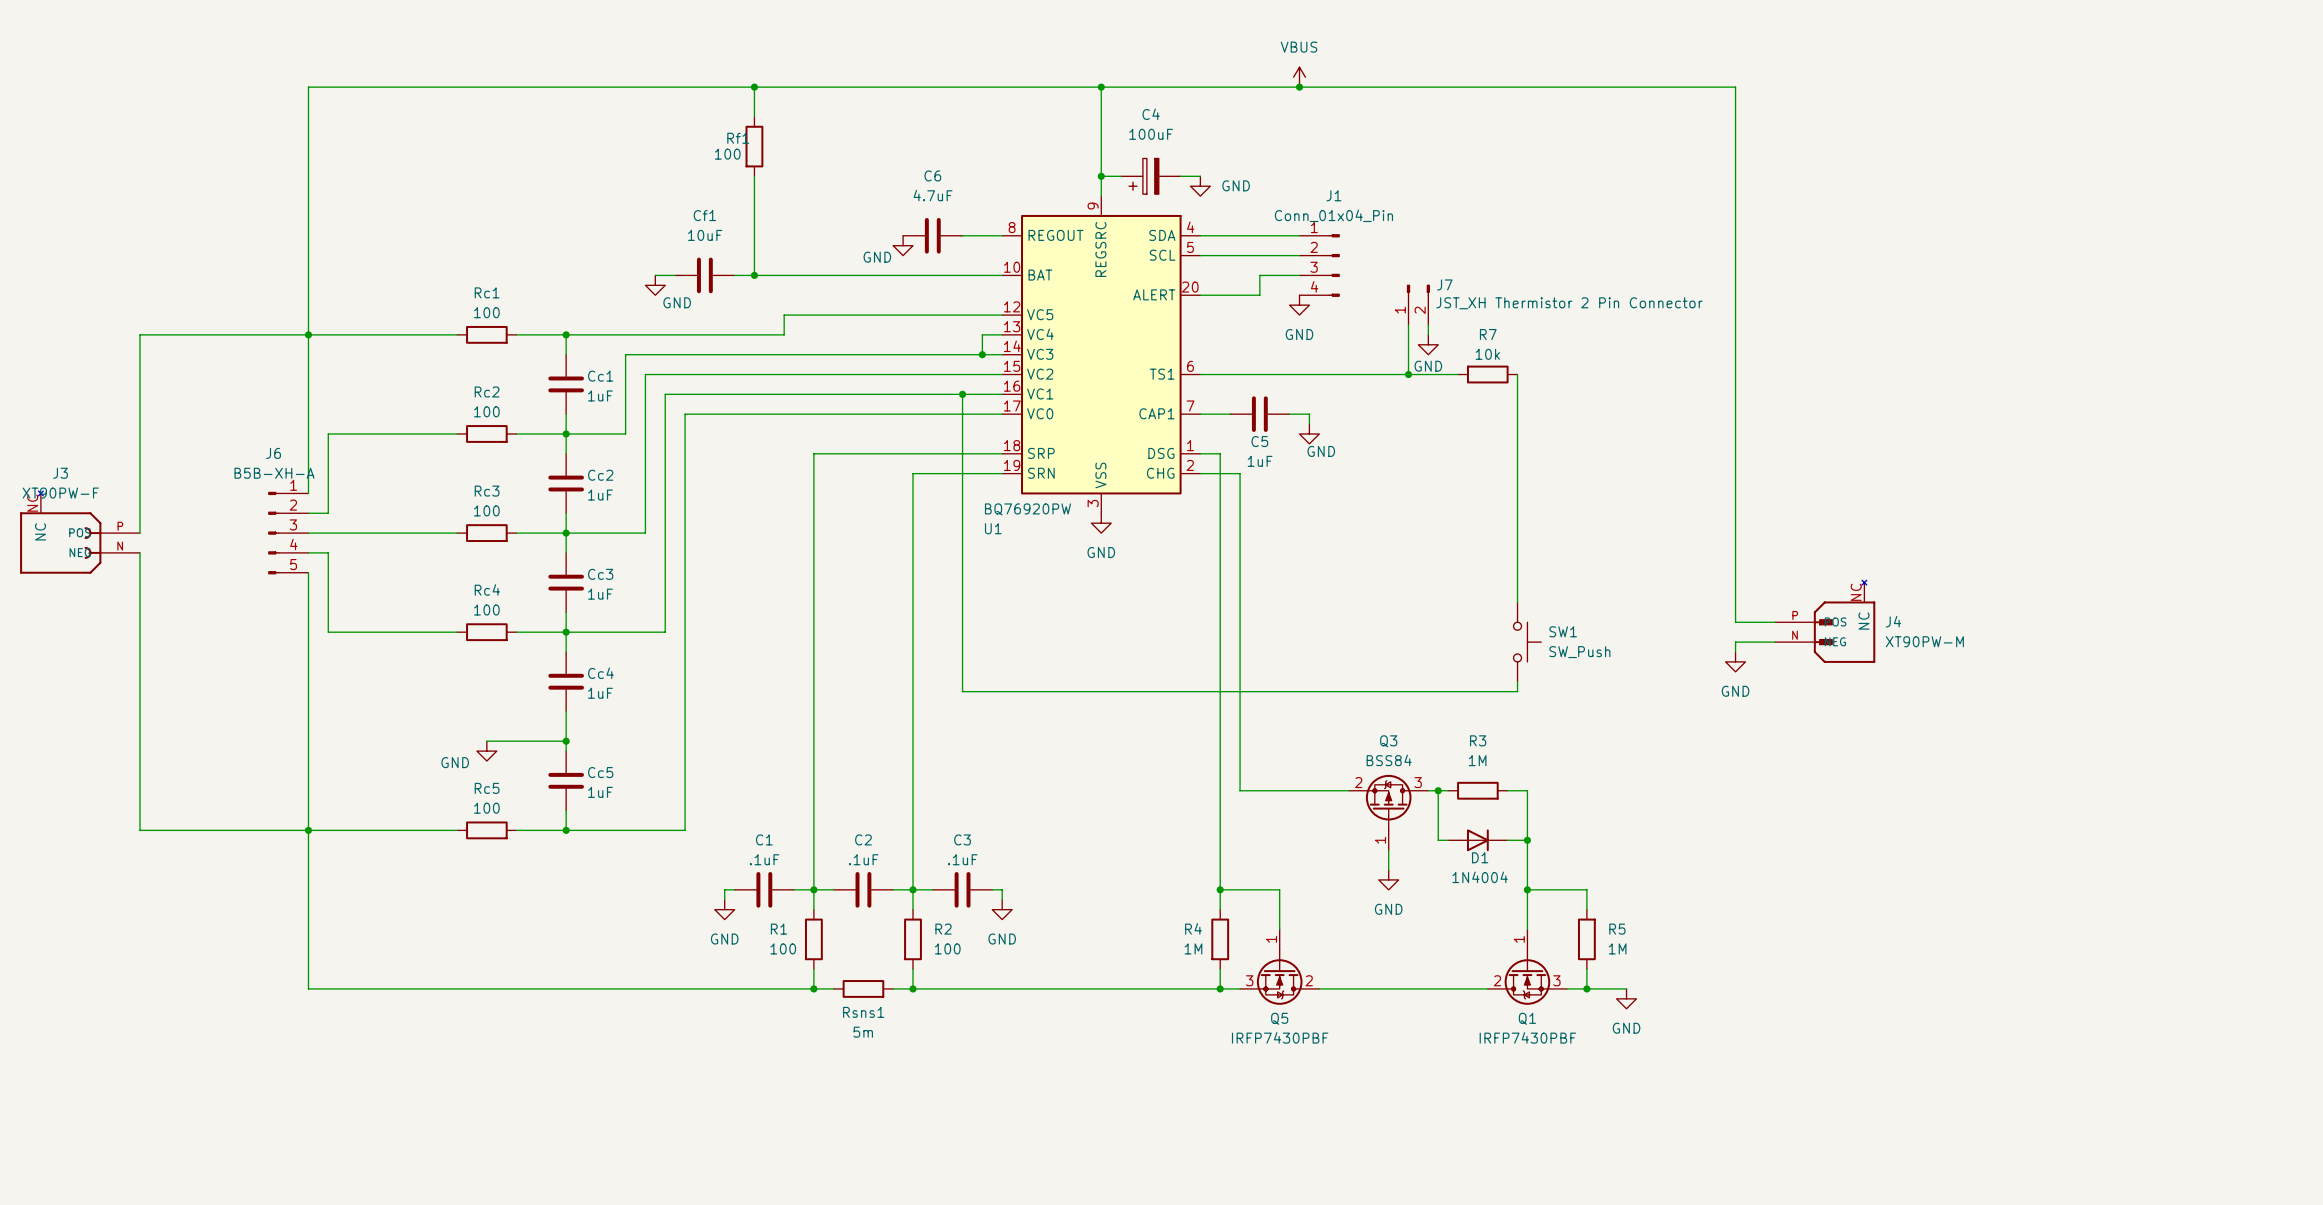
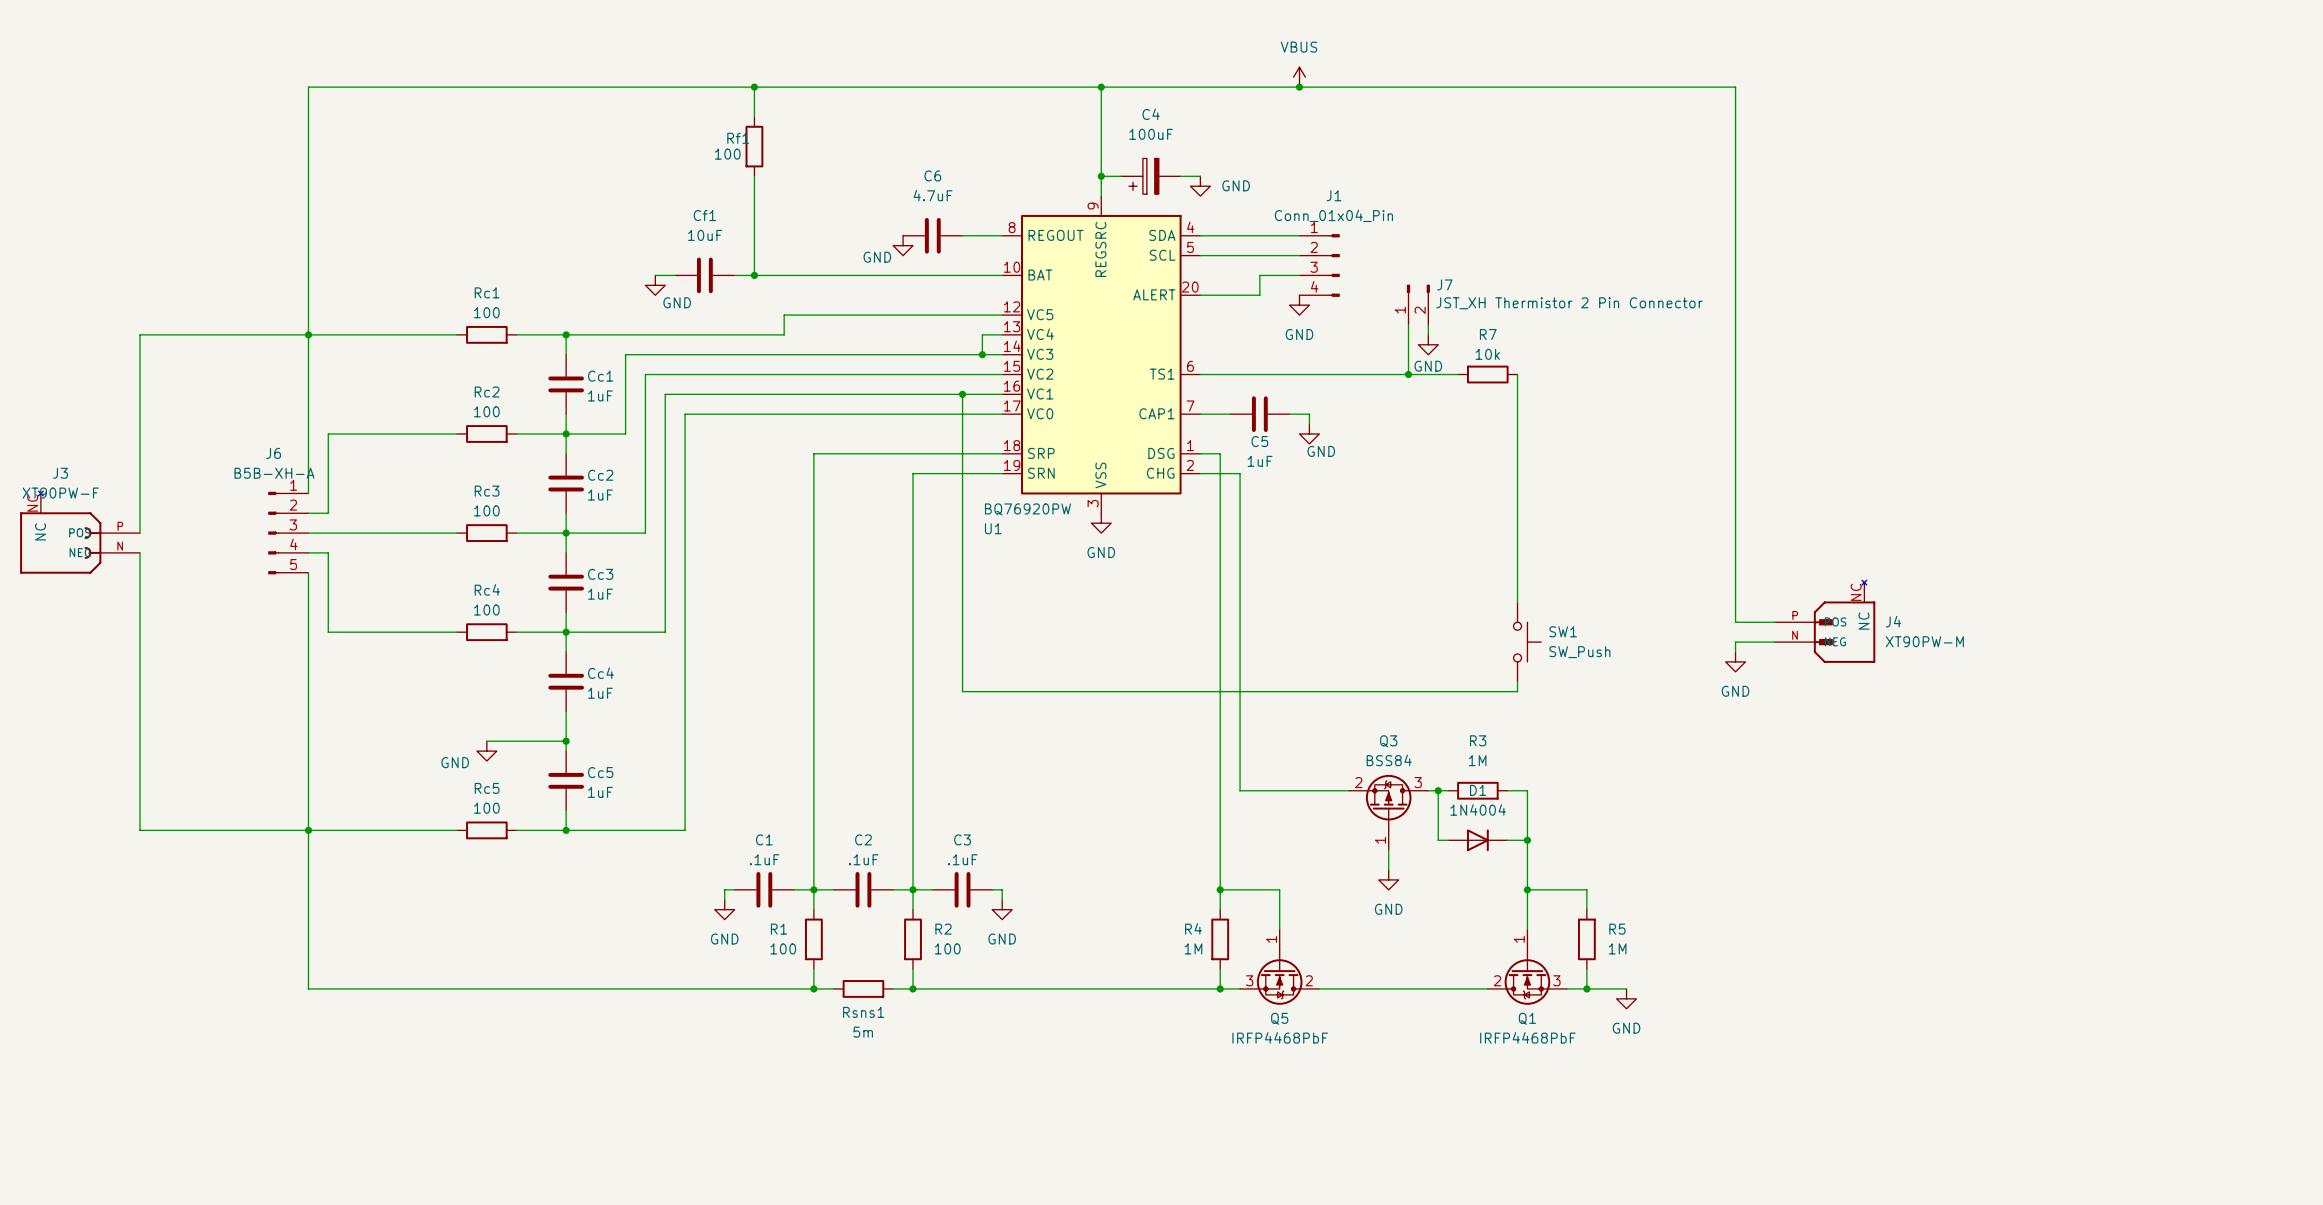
D1 name position: D1 (1480, 857) -> D1 (1478, 790)
D1 value position: 1N4004 (1480, 877) -> 1N4004 (1478, 809)
Q5 value: IRFP7430PBF (1280, 1037) -> IRFP4468PbF (1280, 1037)
Q1 value: IRFP7430PBF (1527, 1037) -> IRFP4468PbF (1527, 1037)

